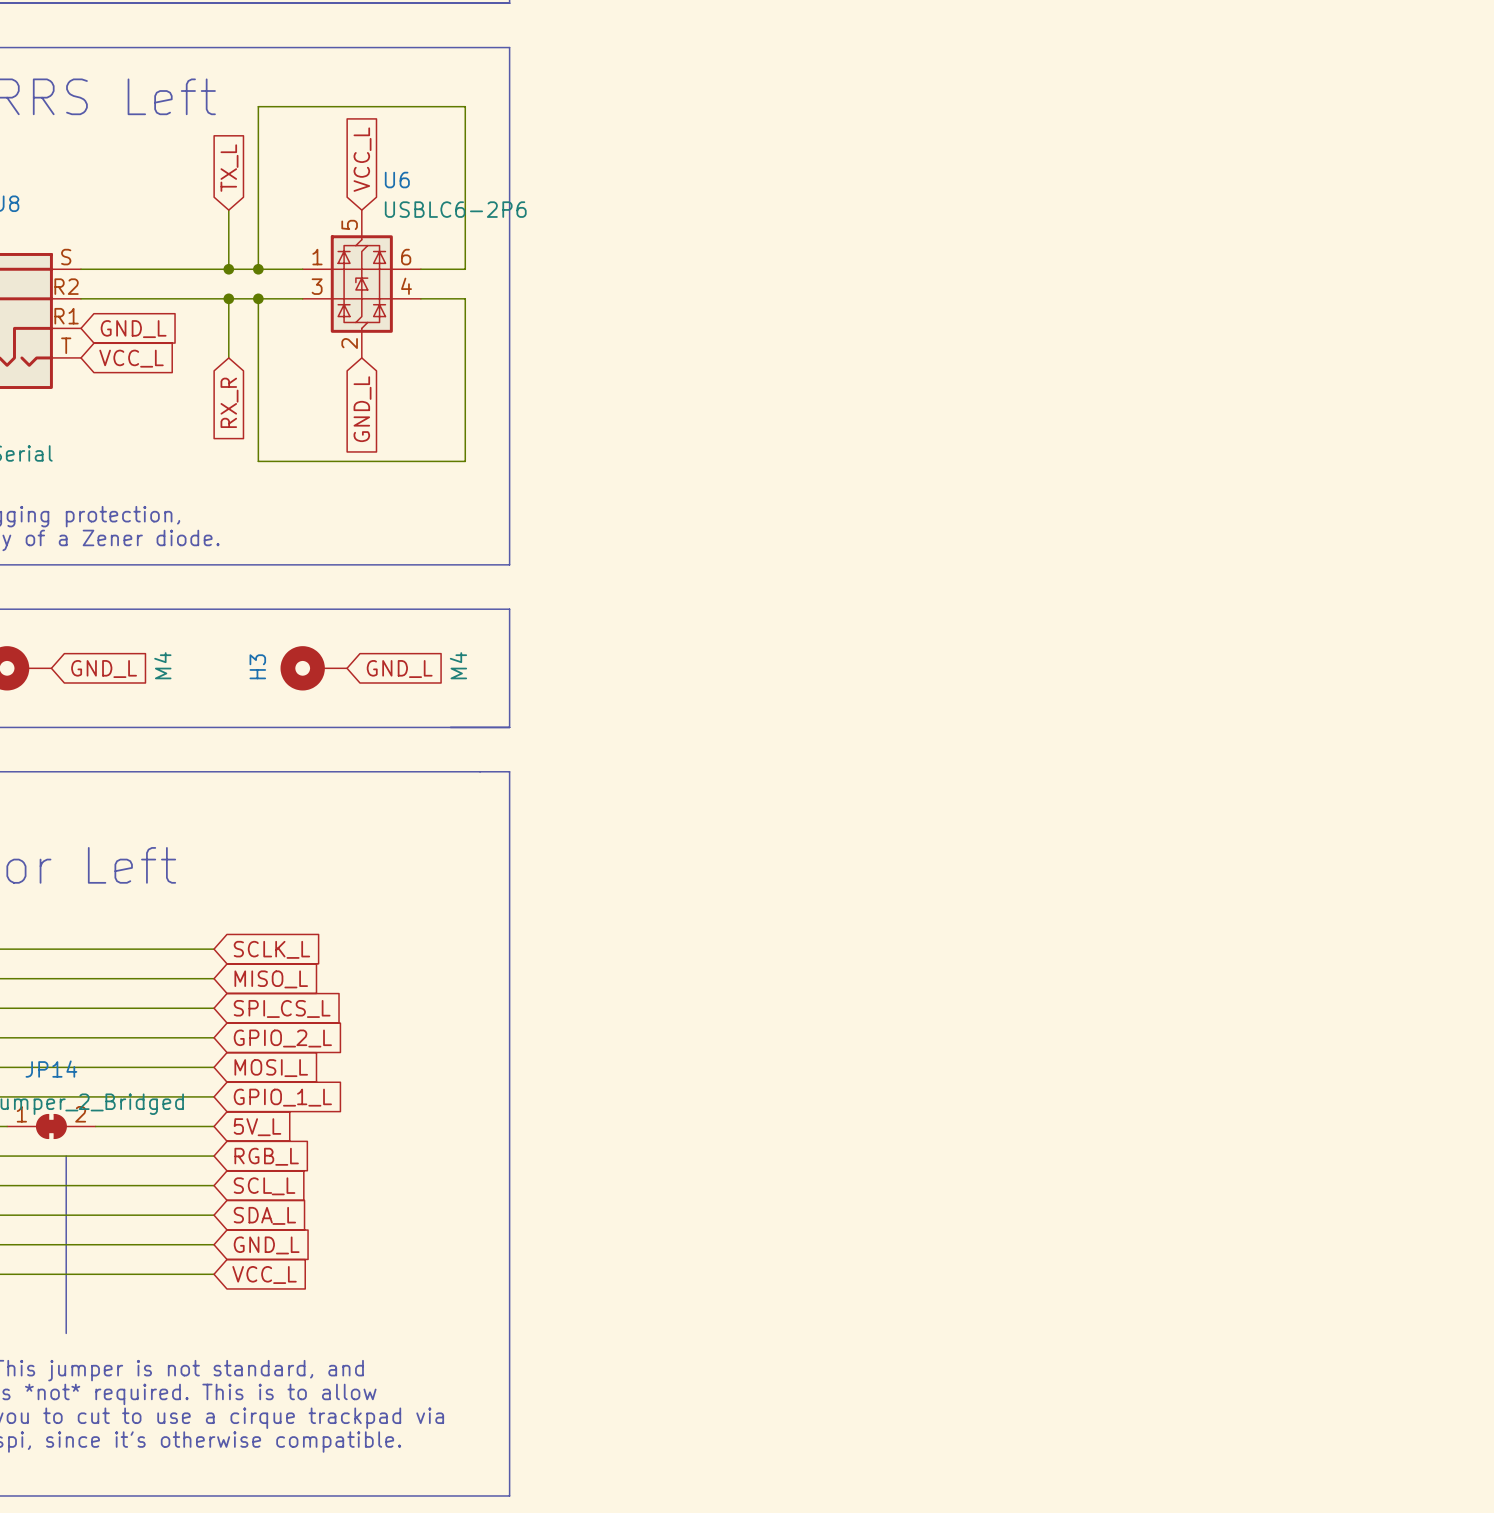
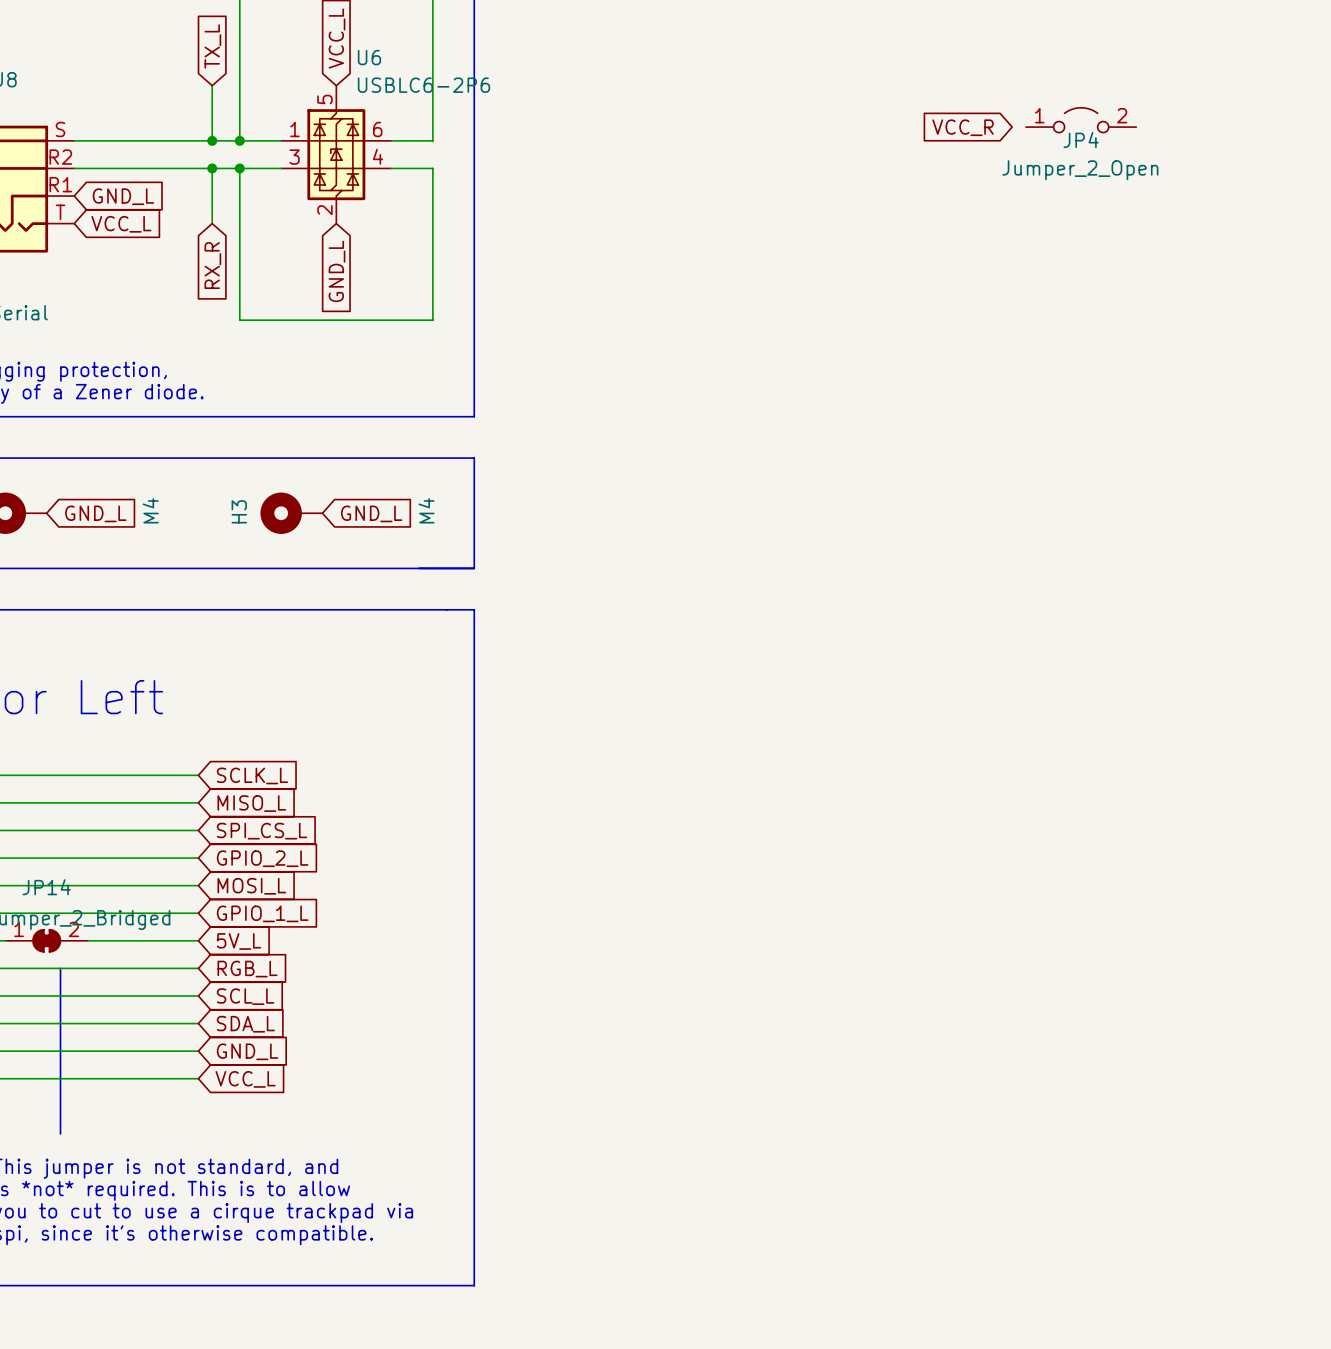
JP4: none -> Jumper_2_Open (1081, 120)
global label: none -> VCC_R (963, 127)

